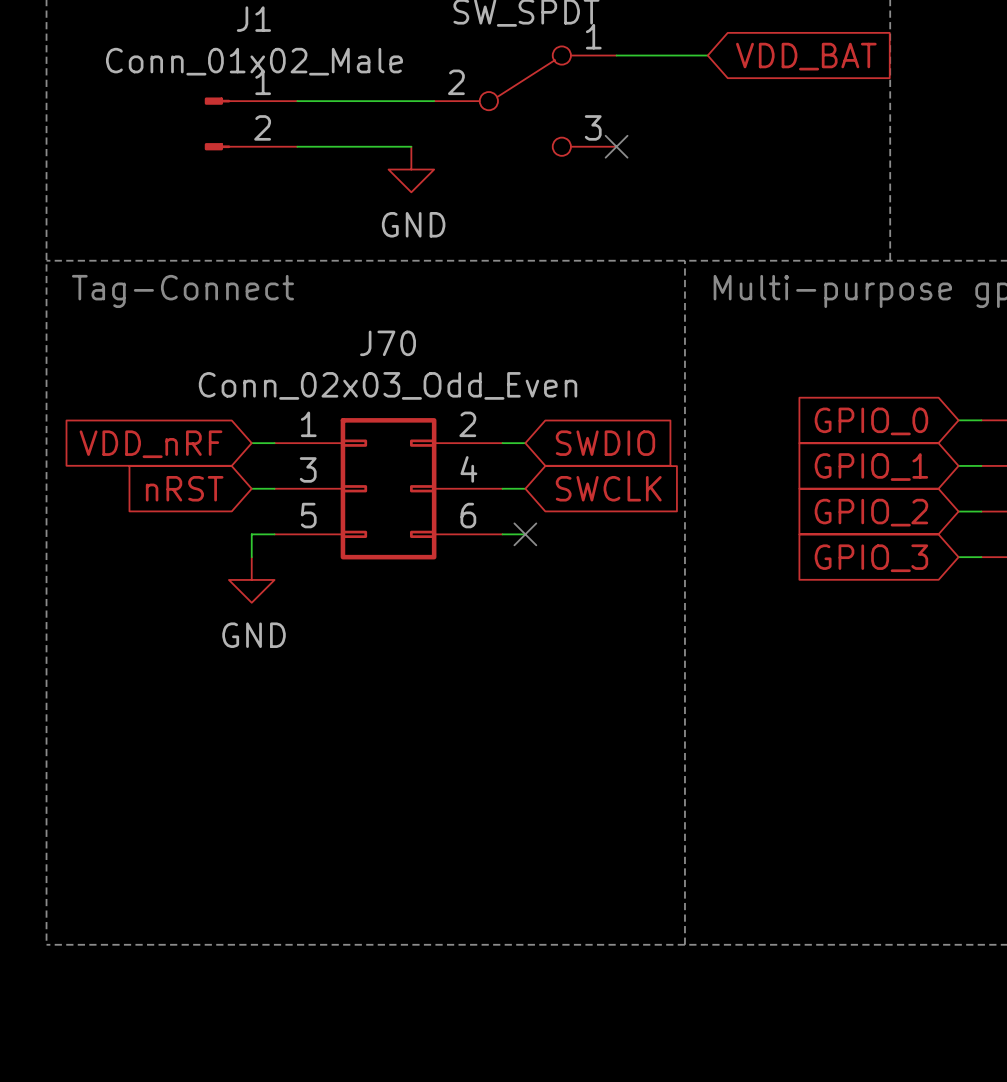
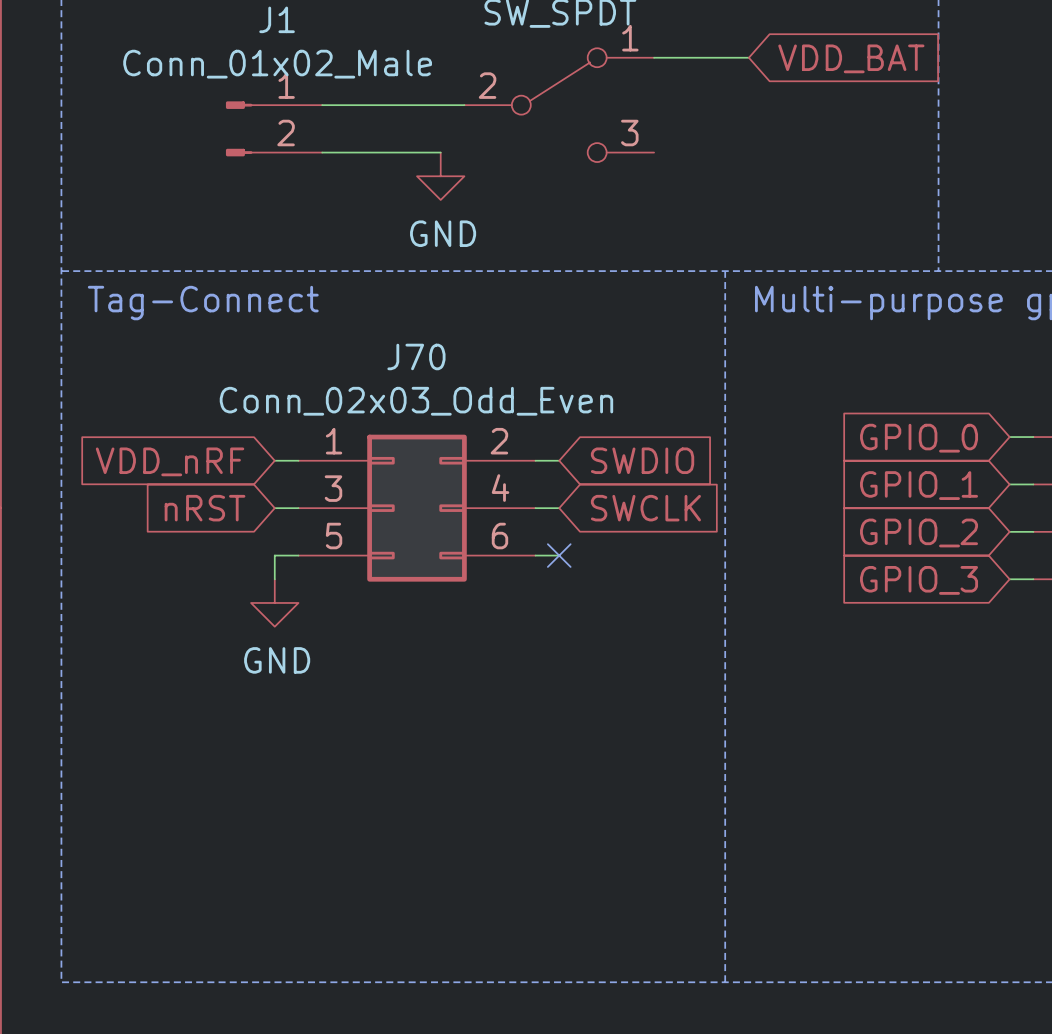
no-connect mark: (616, 146) -> none

